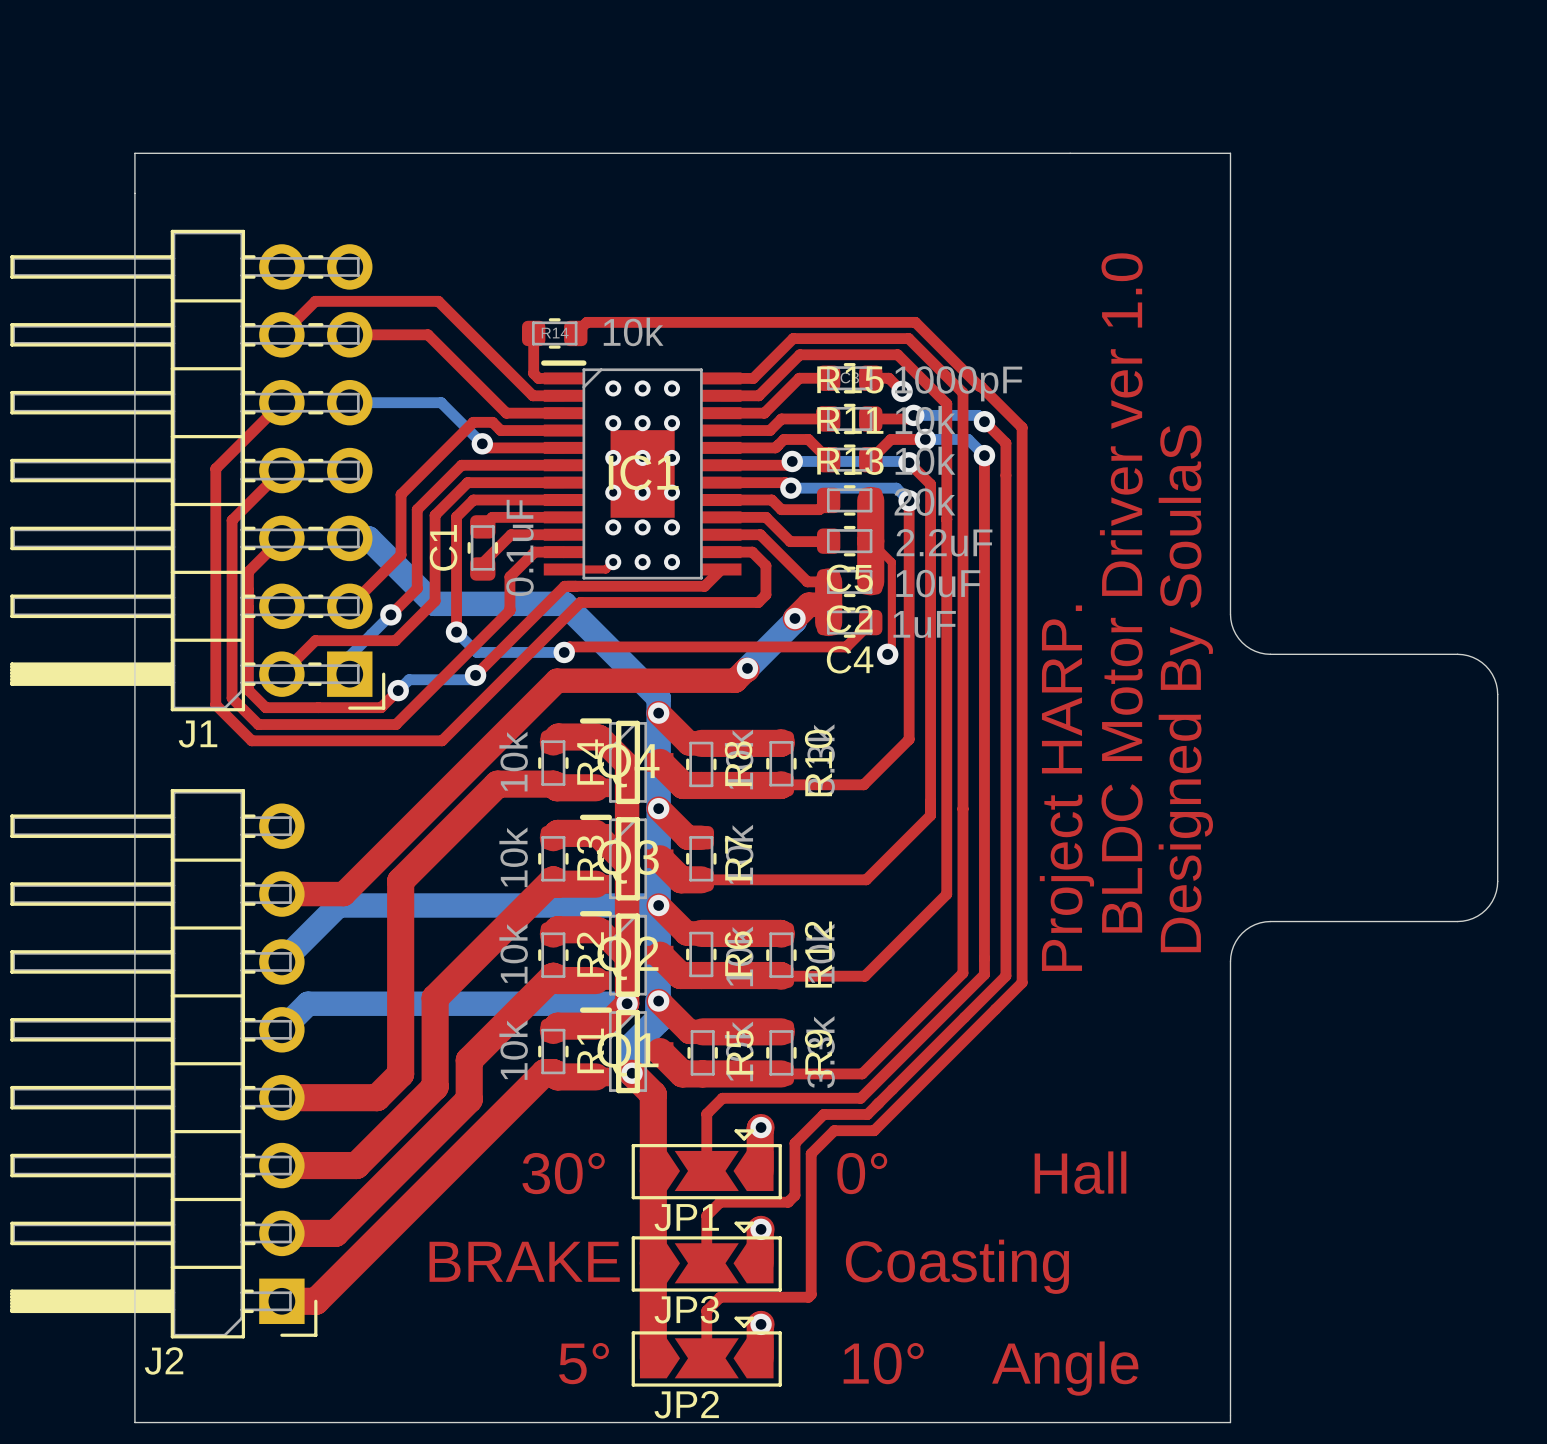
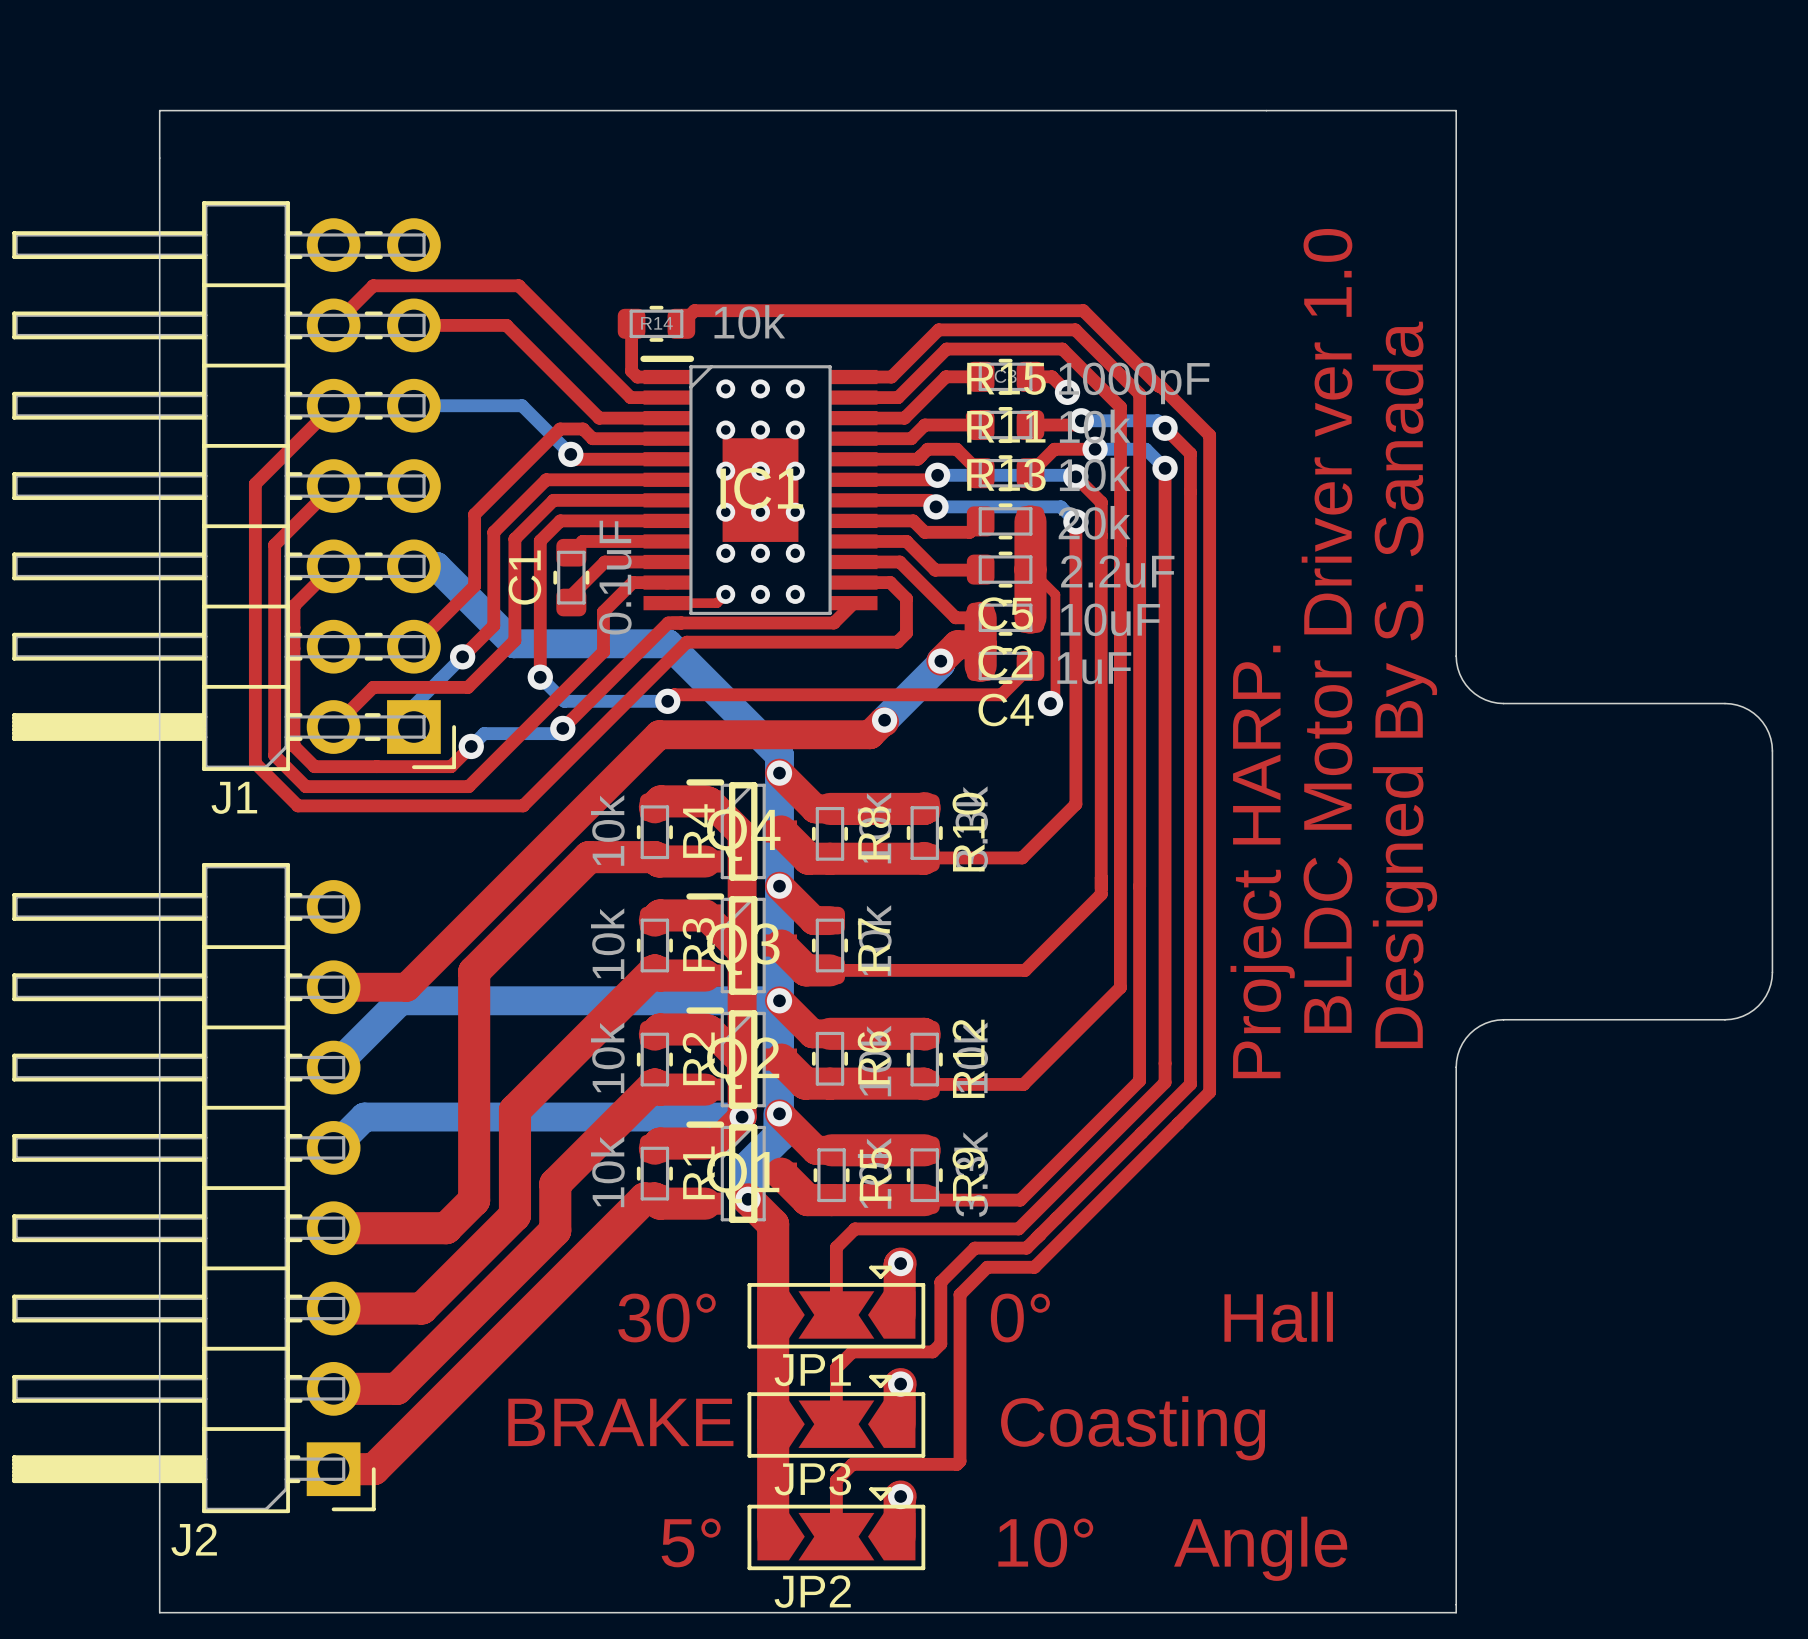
text: Designed By SoulaS (1185, 688) -> Designed By S. Sanada (1404, 684)

